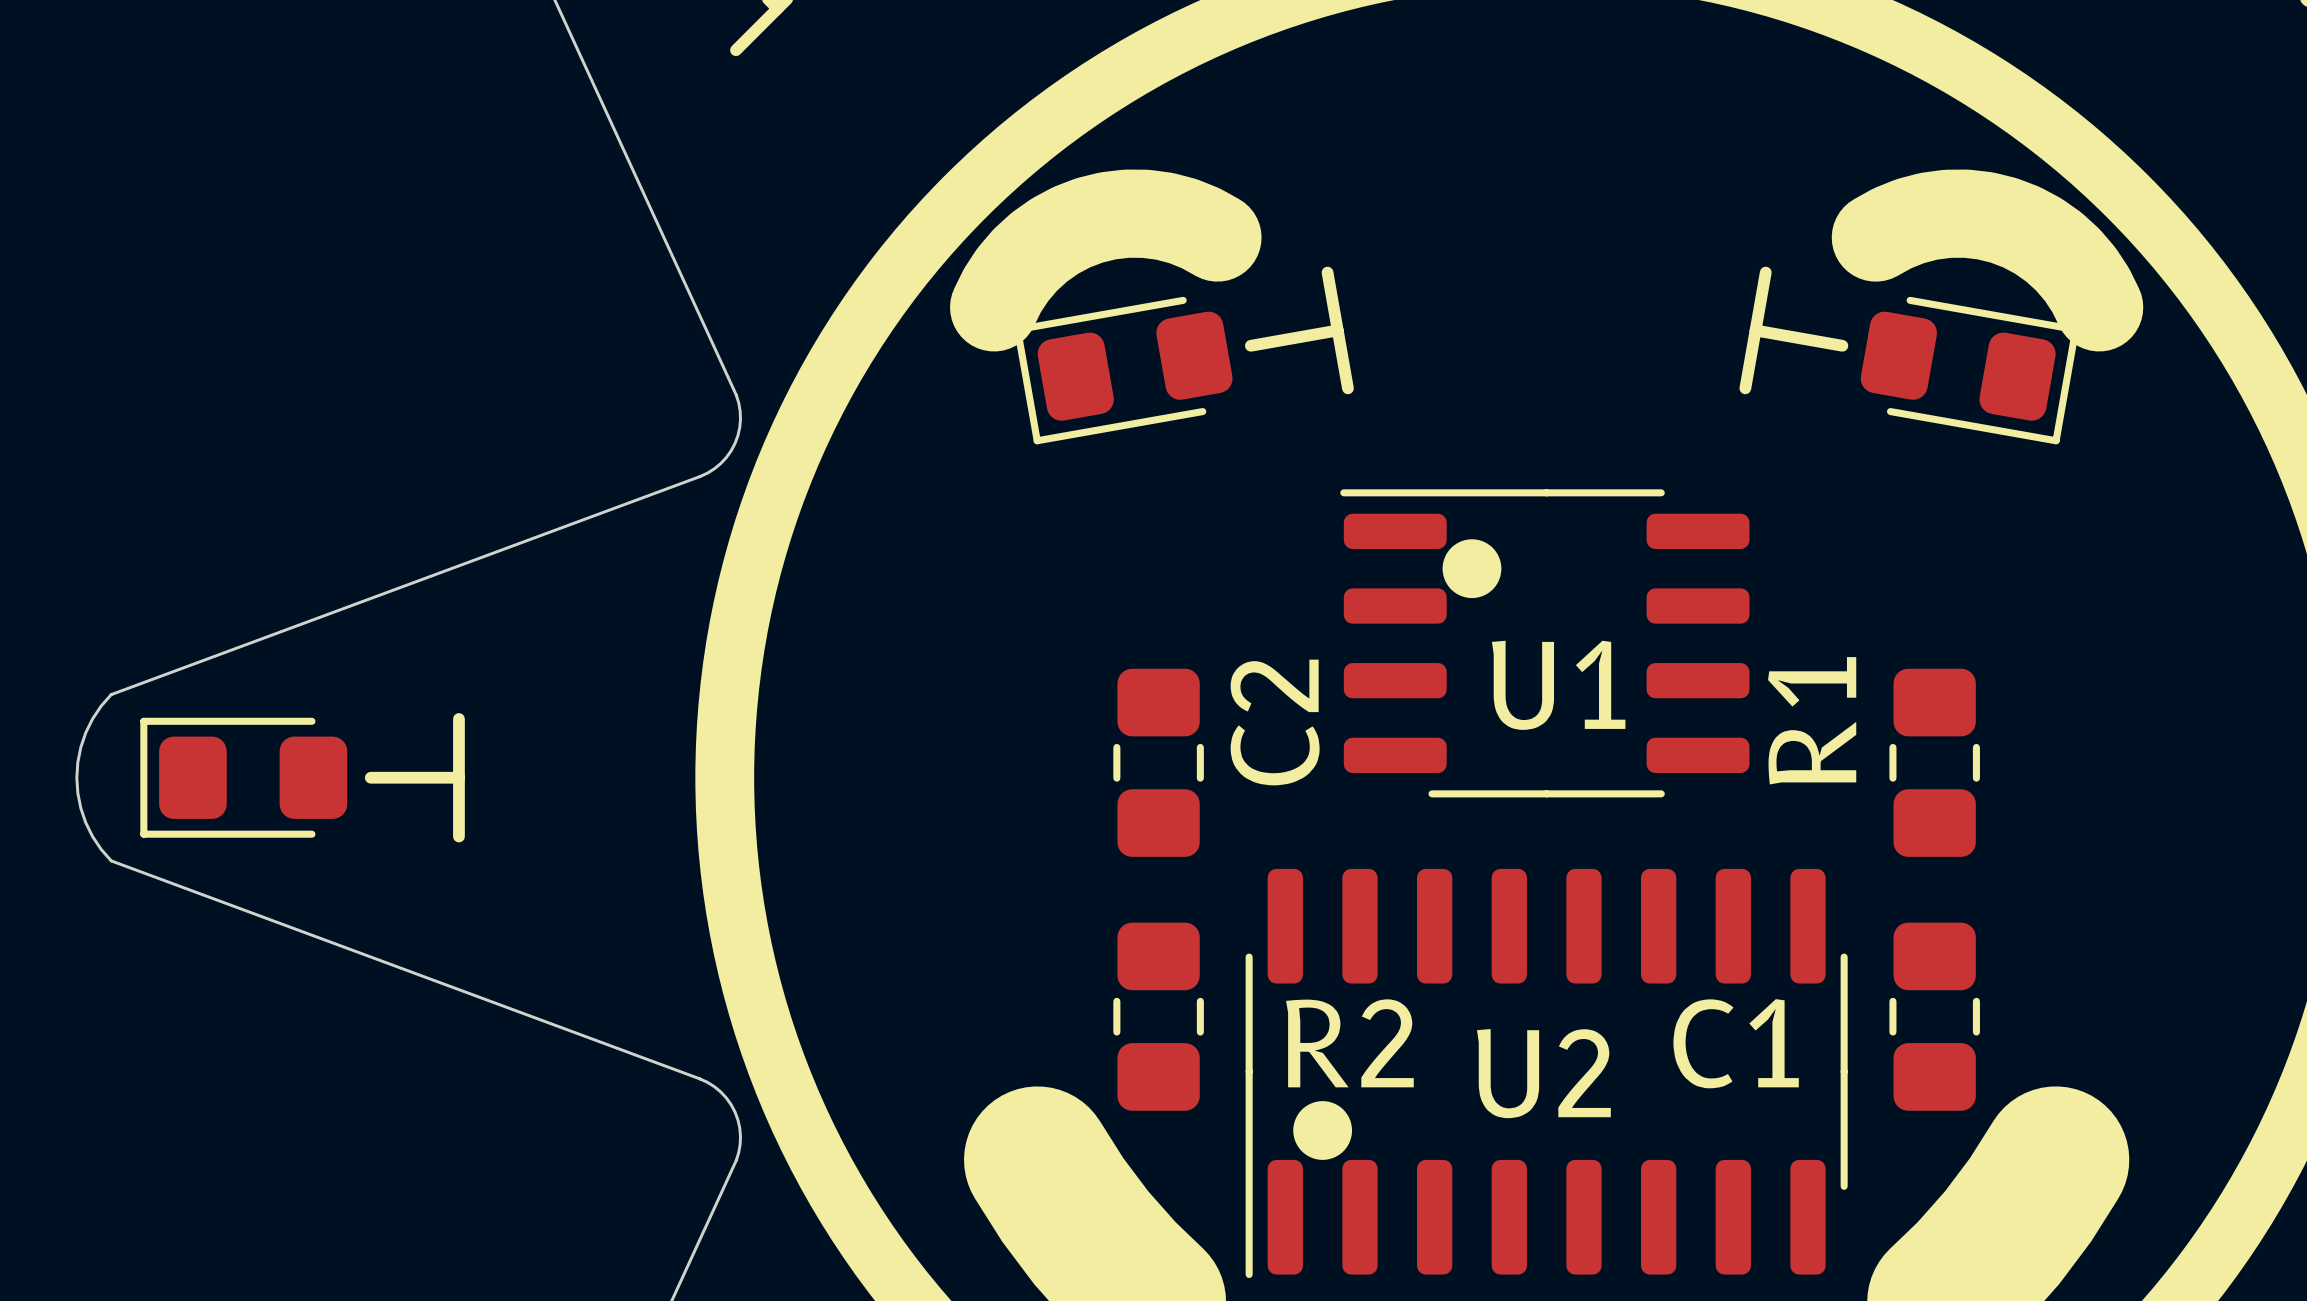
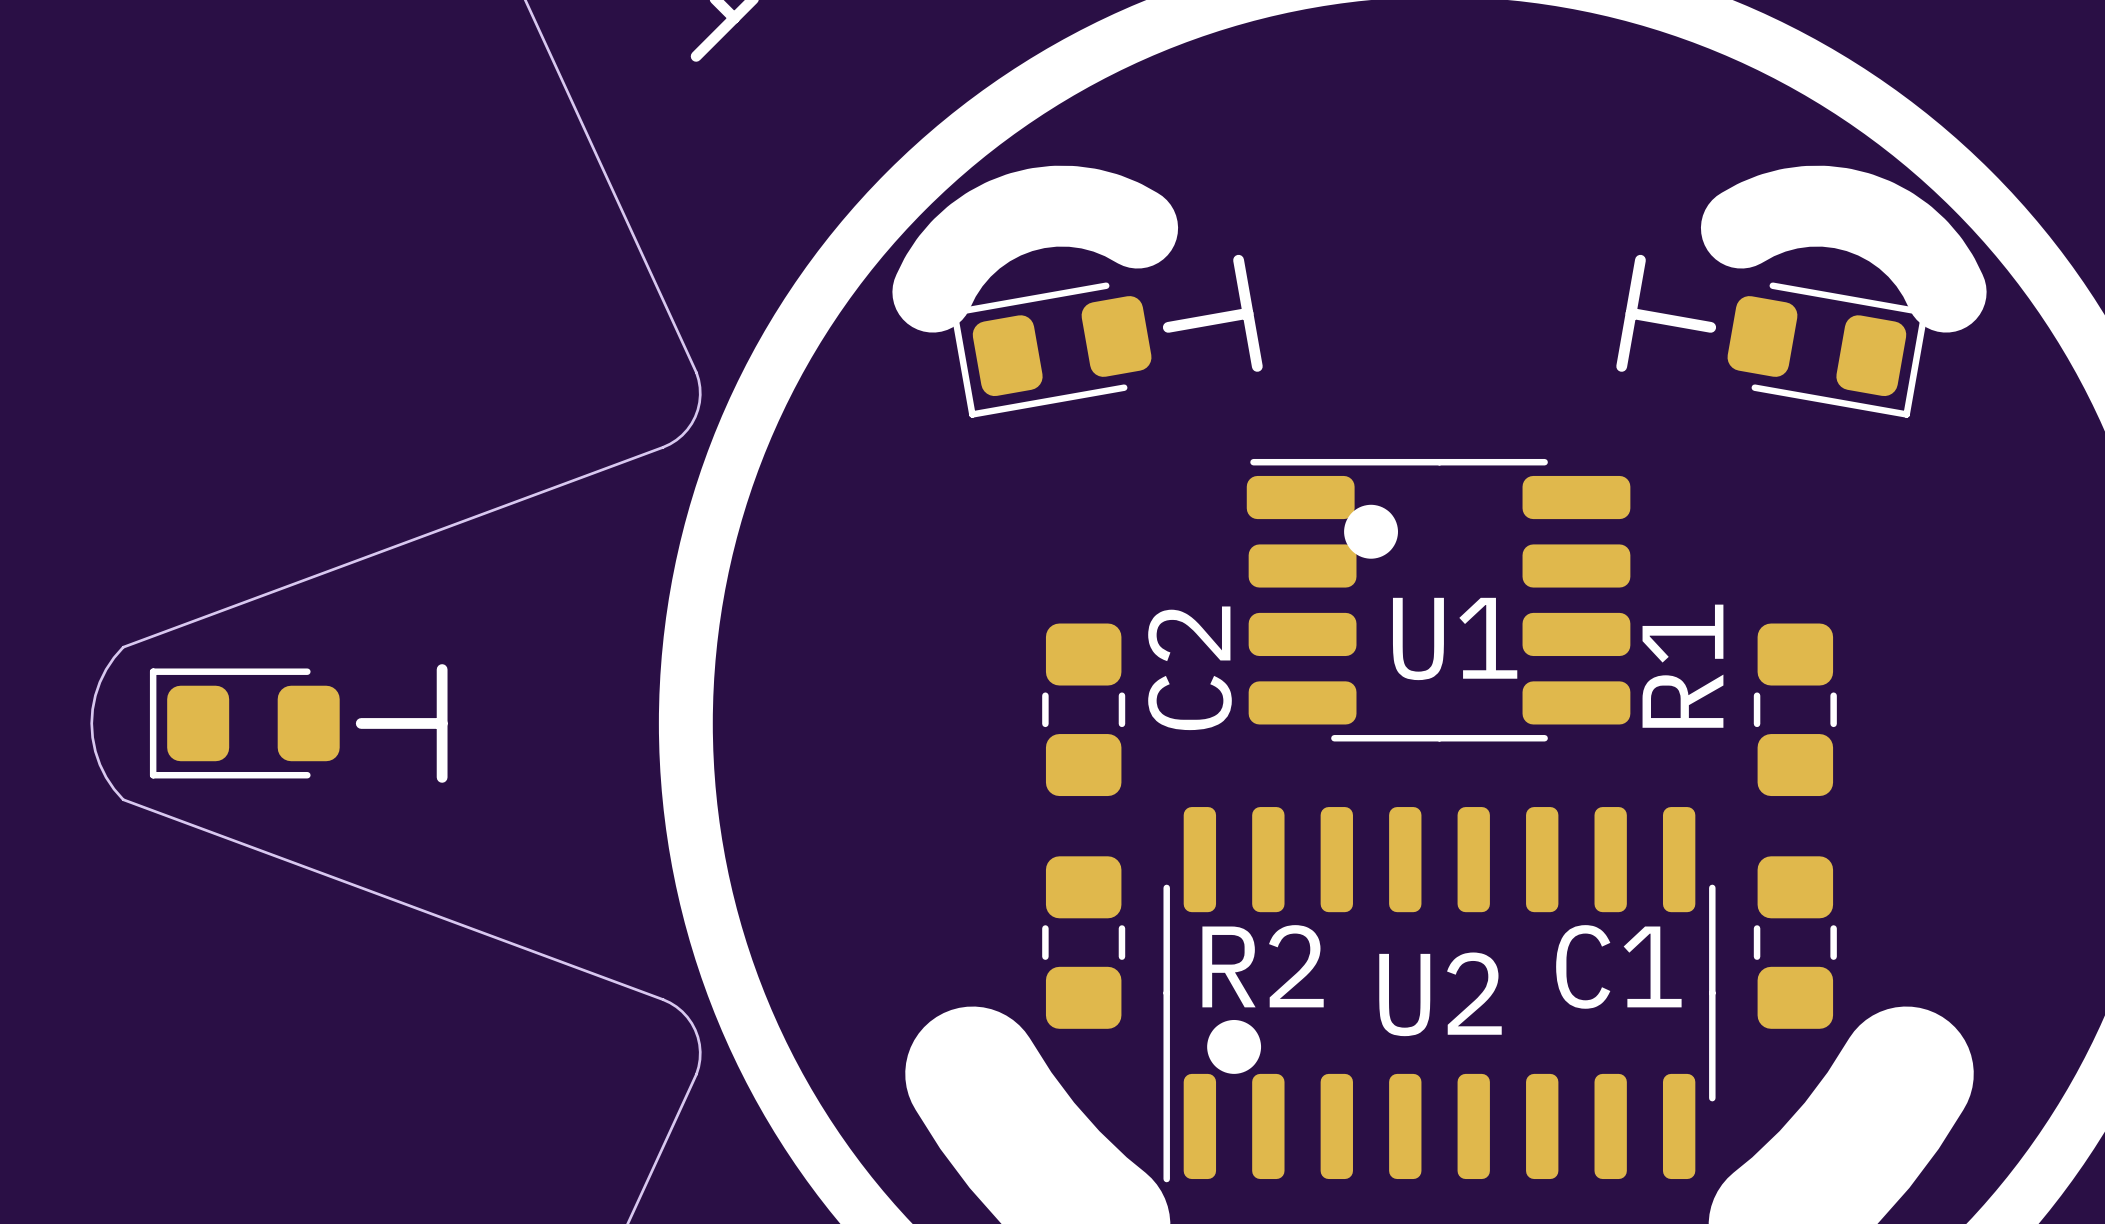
U1 footprint: [1340, 489, 1750, 798] -> [1246, 458, 1631, 742]

